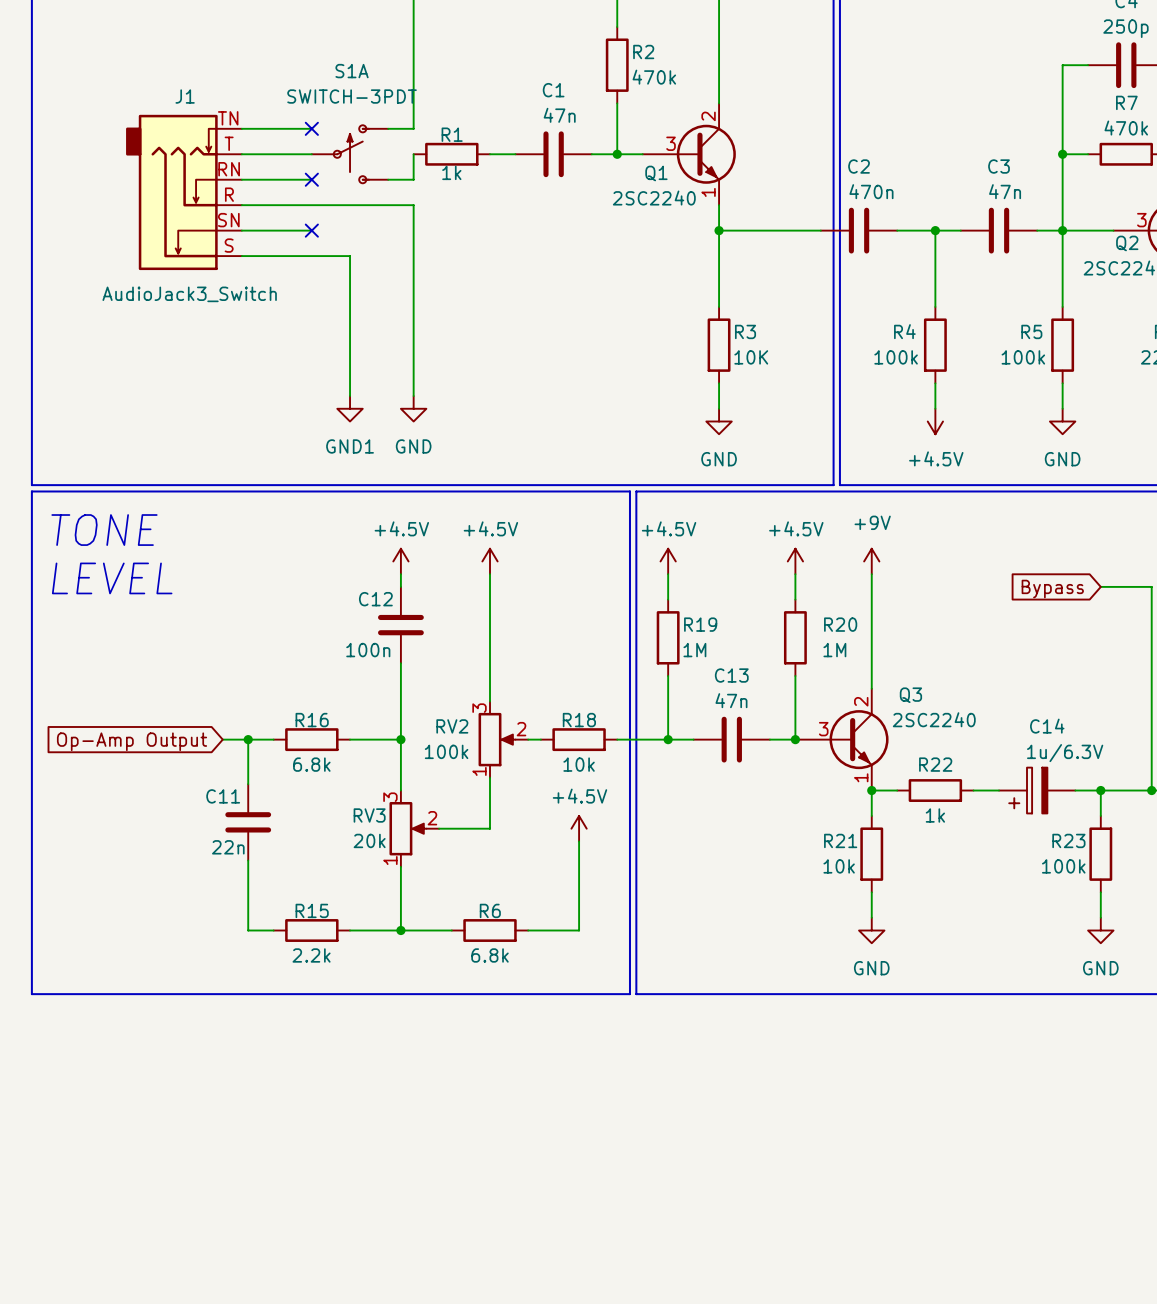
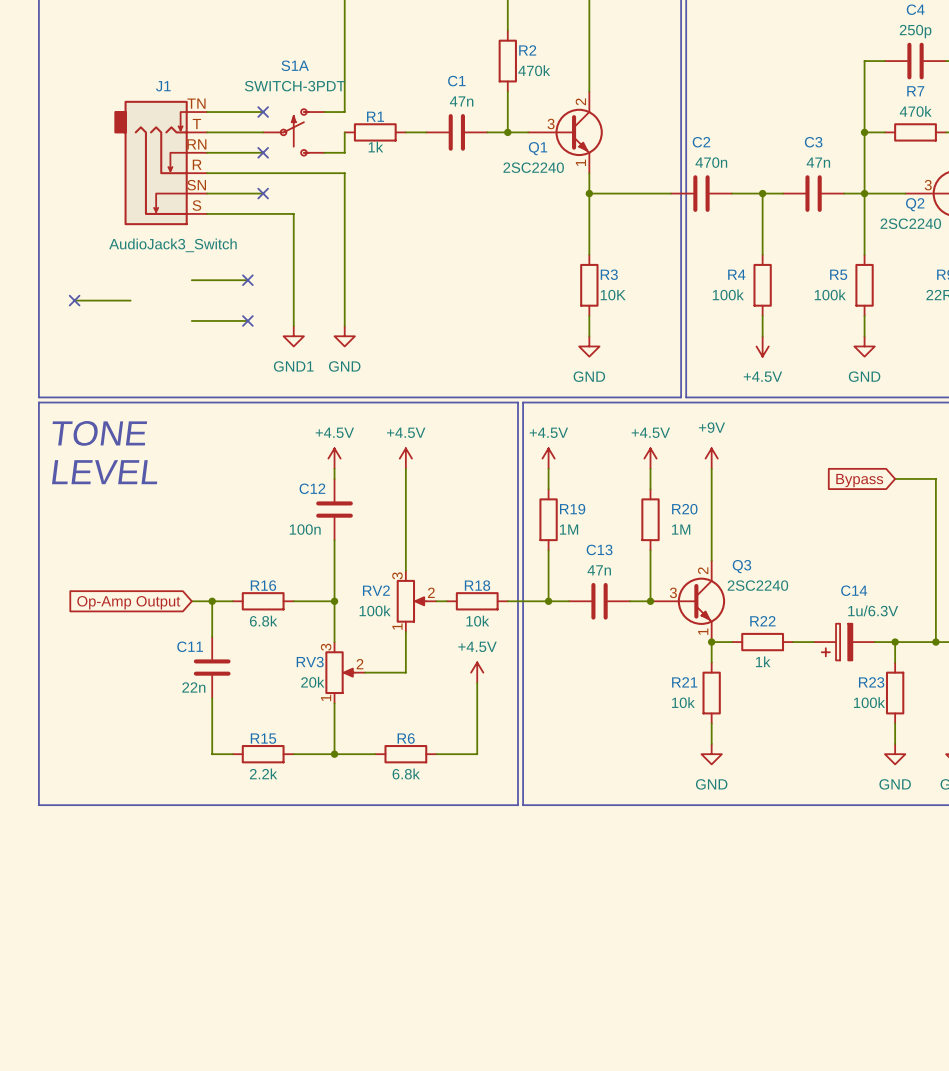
wire: none -> (191, 280) (247, 280)
no-connect mark: none -> (247, 280)
wire: none -> (74, 300) (130, 300)
no-connect mark: none -> (74, 300)
wire: none -> (191, 320) (247, 320)
no-connect mark: none -> (247, 320)

